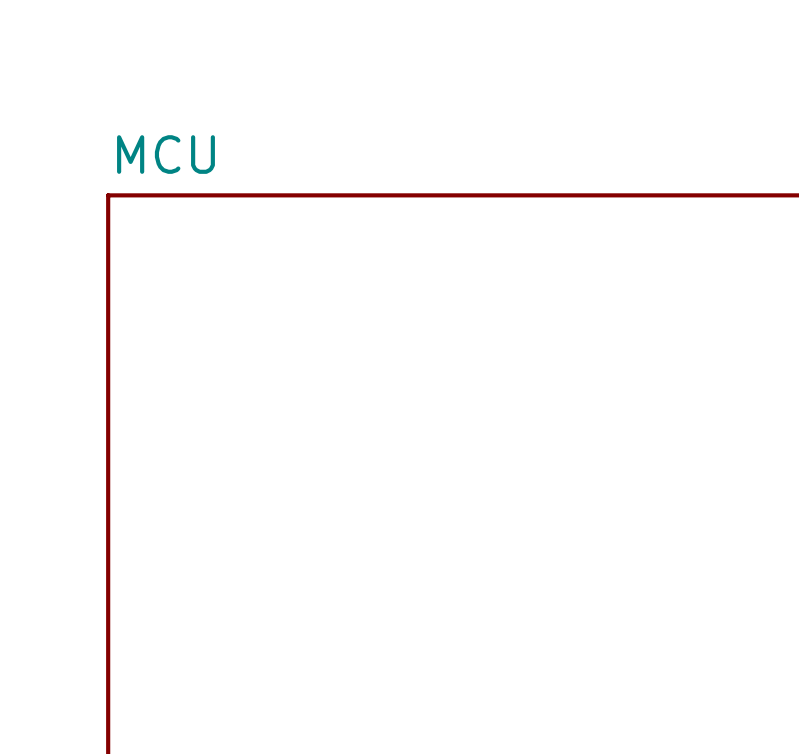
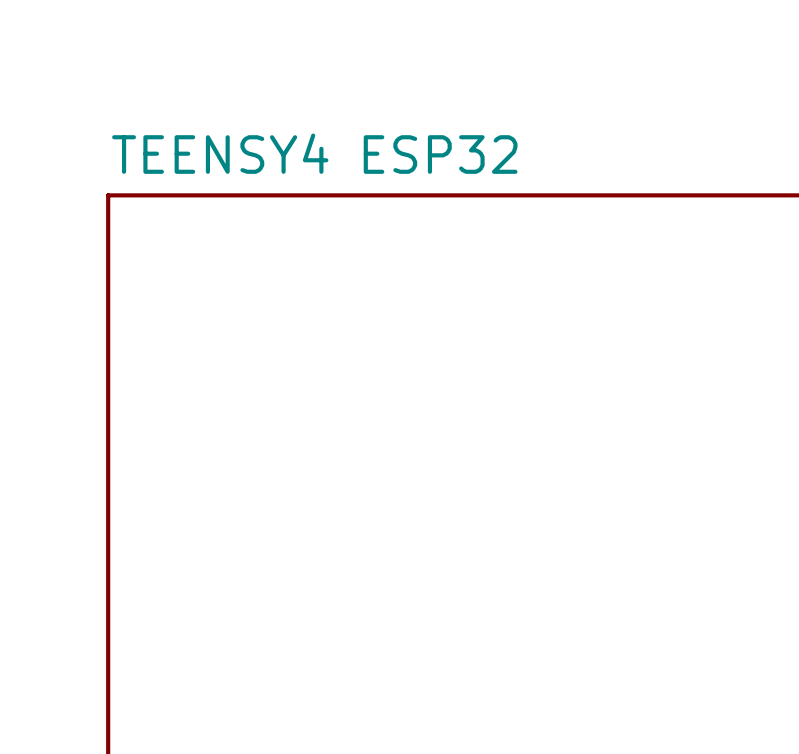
sheet MCU name: MCU (165, 154) -> TEENSY4 ESP32 (314, 153)

